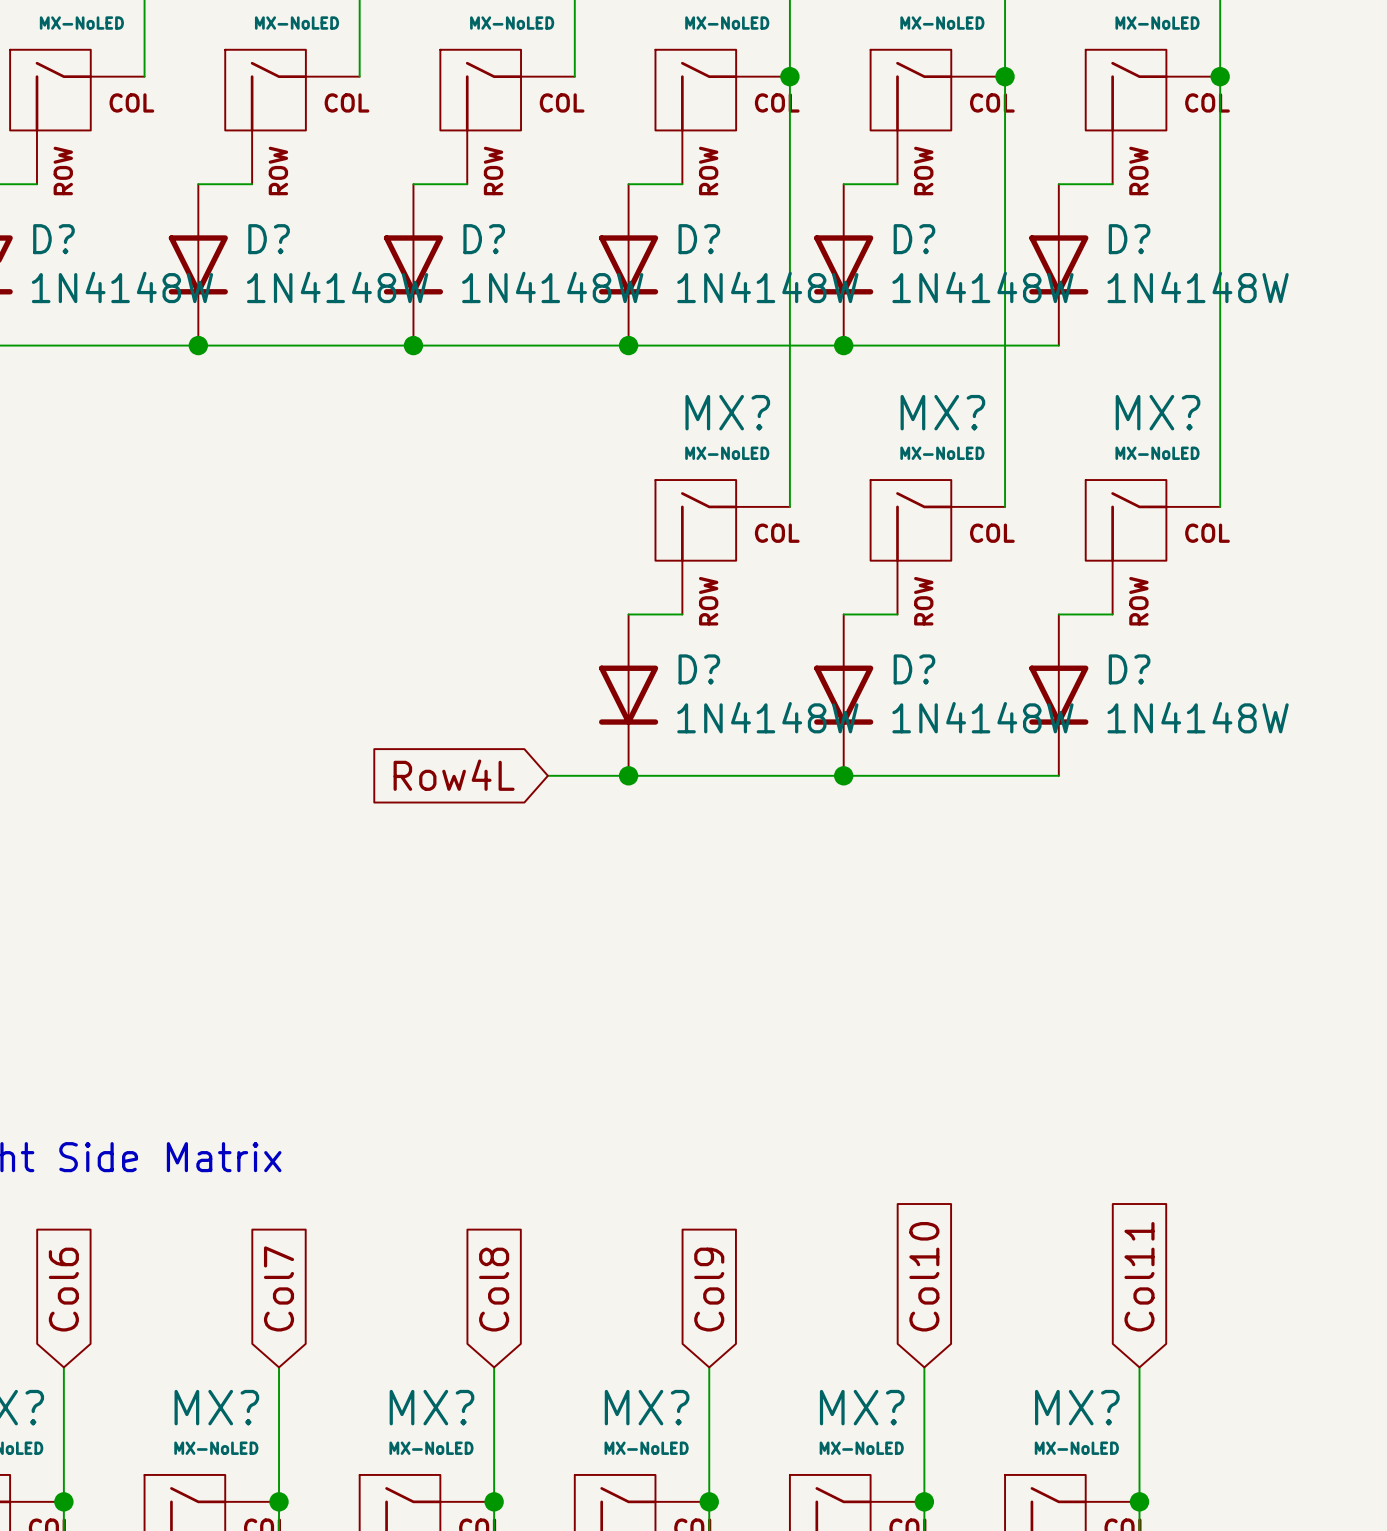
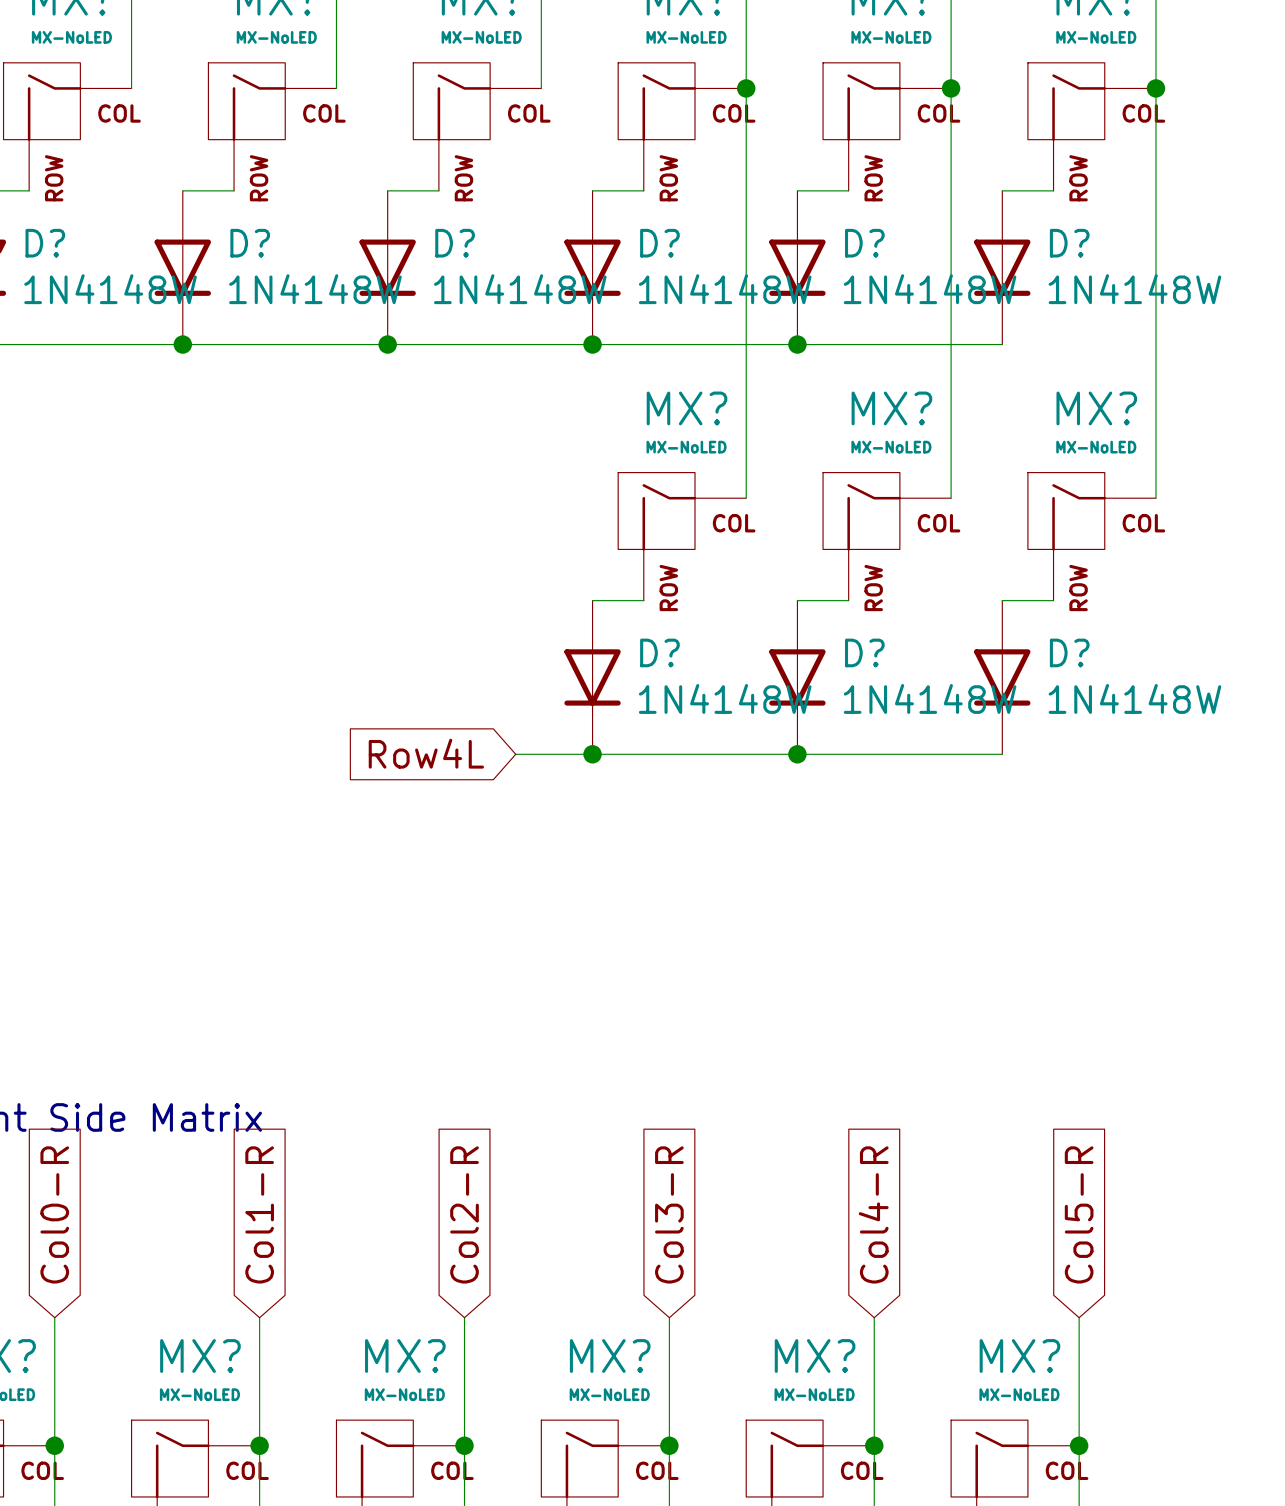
global label: Col10 (924, 1276) -> Col4-R (873, 1214)
global label: Col11 (1139, 1276) -> Col5-R (1079, 1214)
global label: Col7 (279, 1288) -> Col1-R (259, 1214)
global label: Col6 (63, 1289) -> Col0-R (54, 1214)
global label: Col8 (494, 1289) -> Col2-R (464, 1214)
global label: Col9 (709, 1289) -> Col3-R (669, 1214)

